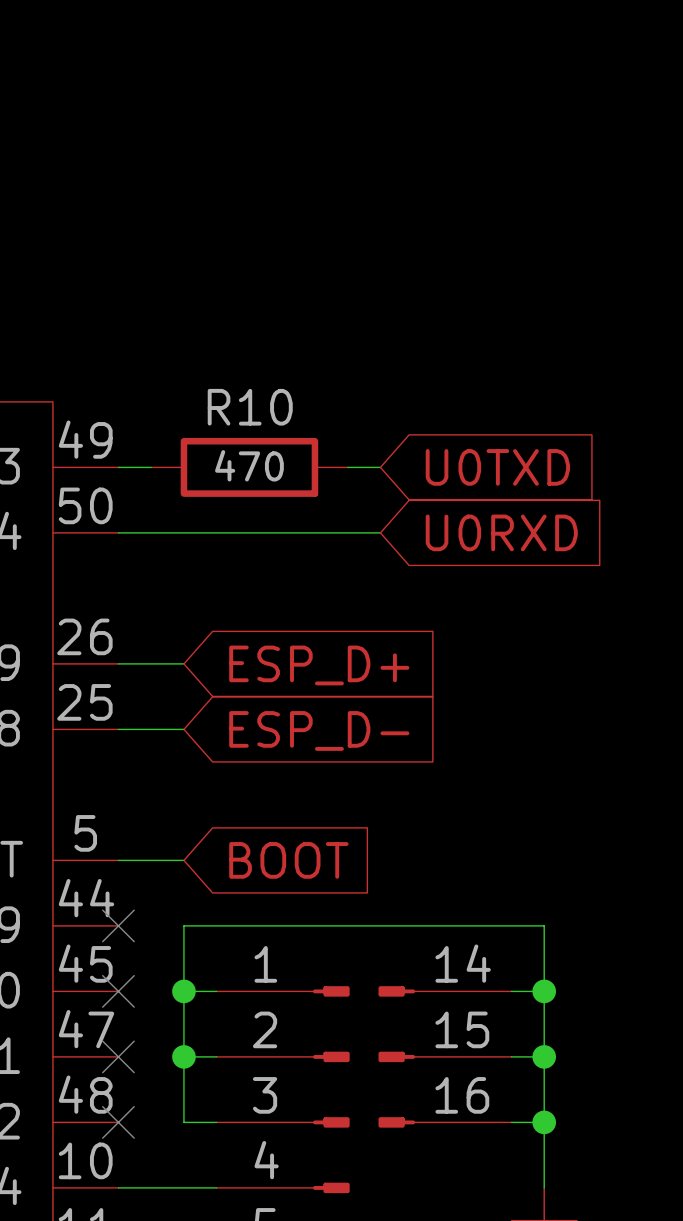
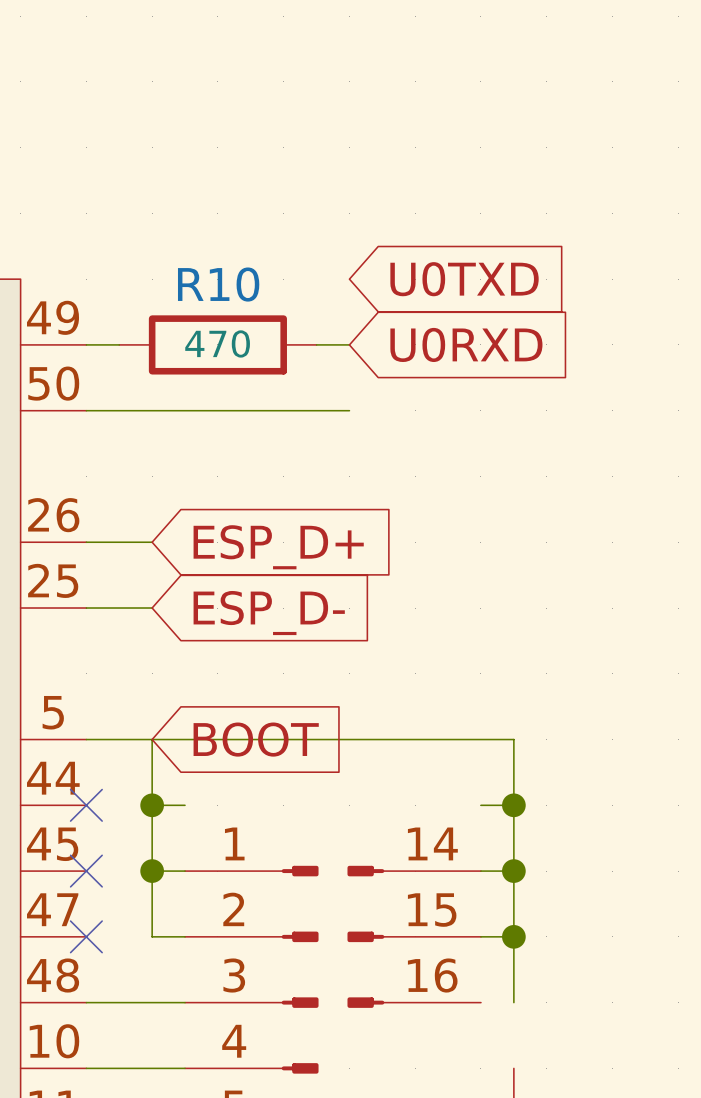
global label: none -> U0TXD (464, 279)
global label: U0TXD (497, 467) -> U0RXD (466, 344)
global label: U0RXD (501, 532) -> none
wire: none -> (152, 805) (152, 739) (513, 739) (513, 805)
wire: (216, 925) (511, 925) -> none
junction: none -> (513, 805)
wire: (183, 1056) (183, 1122) -> (86, 1002) (152, 1002)
junction position: (183, 1056) -> (152, 805)
no-connect mark: (118, 1122) -> none
wire: (511, 1122) (544, 1122) (544, 1187) -> none
junction: (544, 1122) -> none

